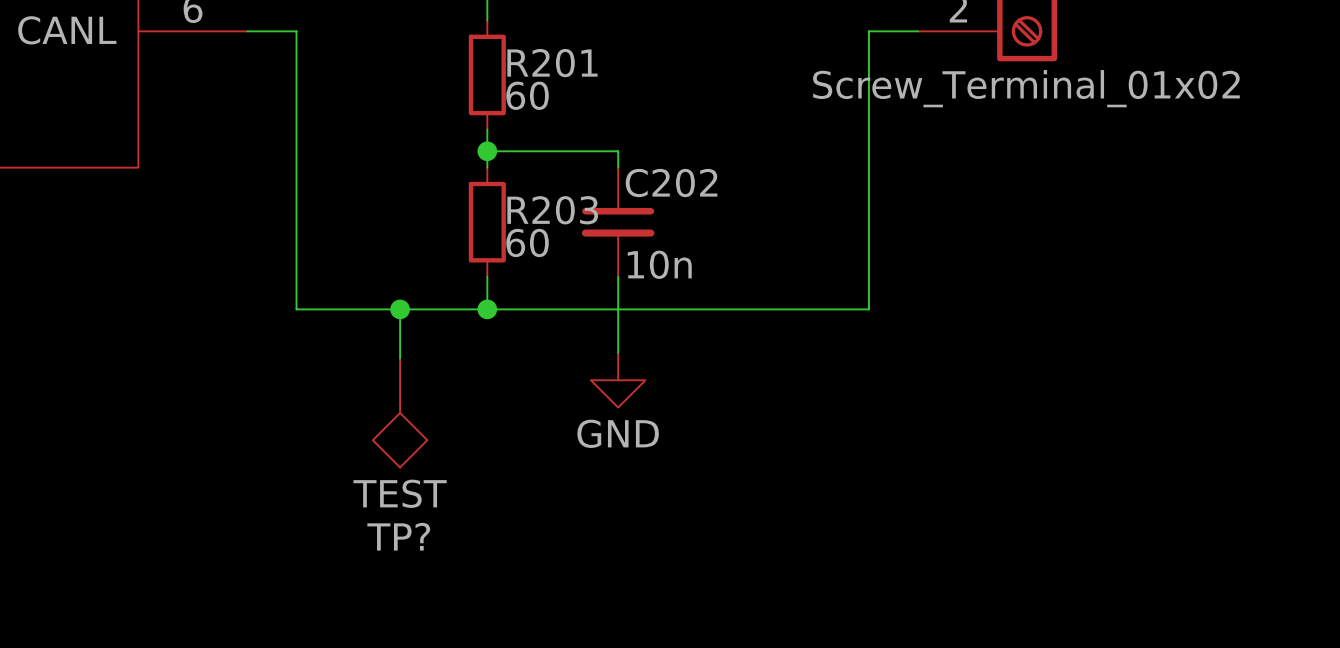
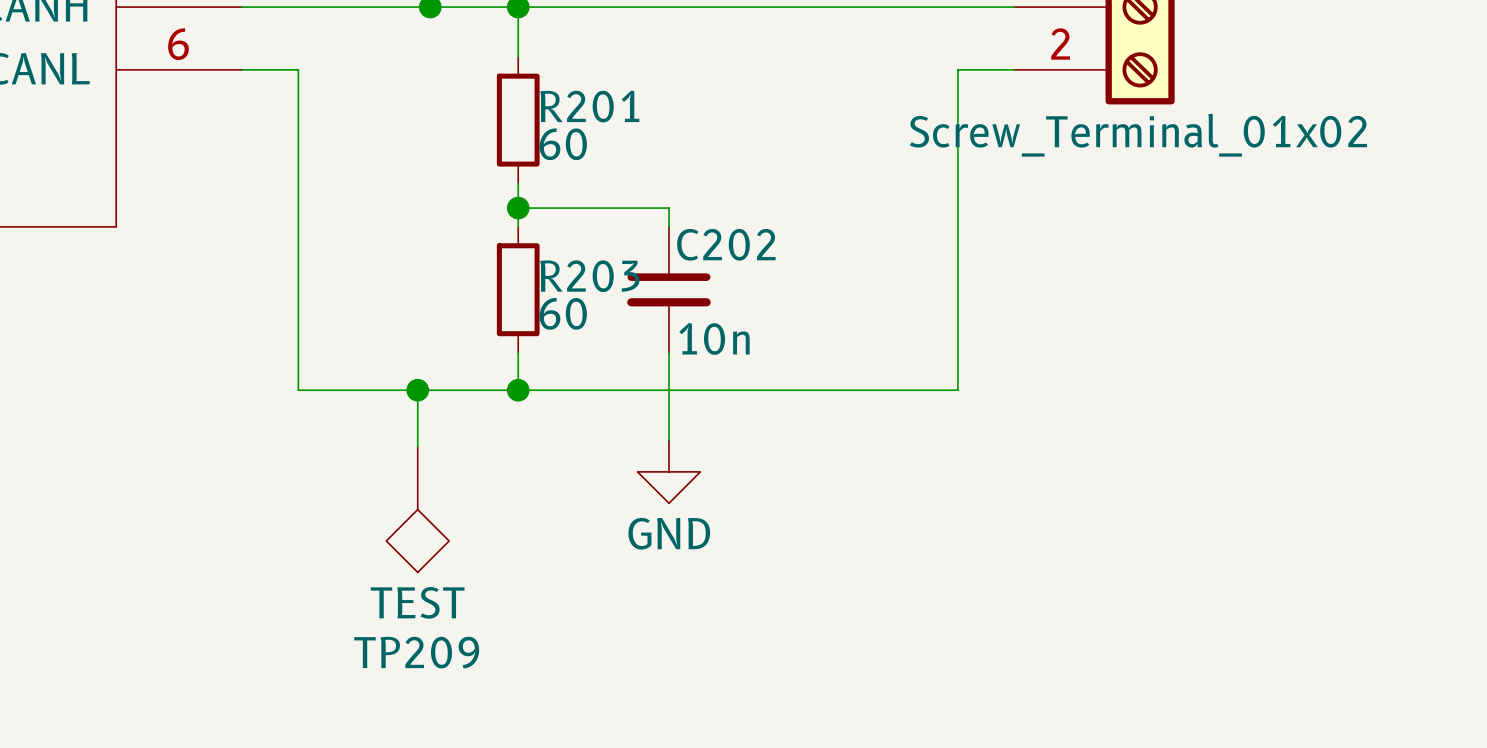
TP? name: TP? (398, 536) -> TP209 (416, 652)

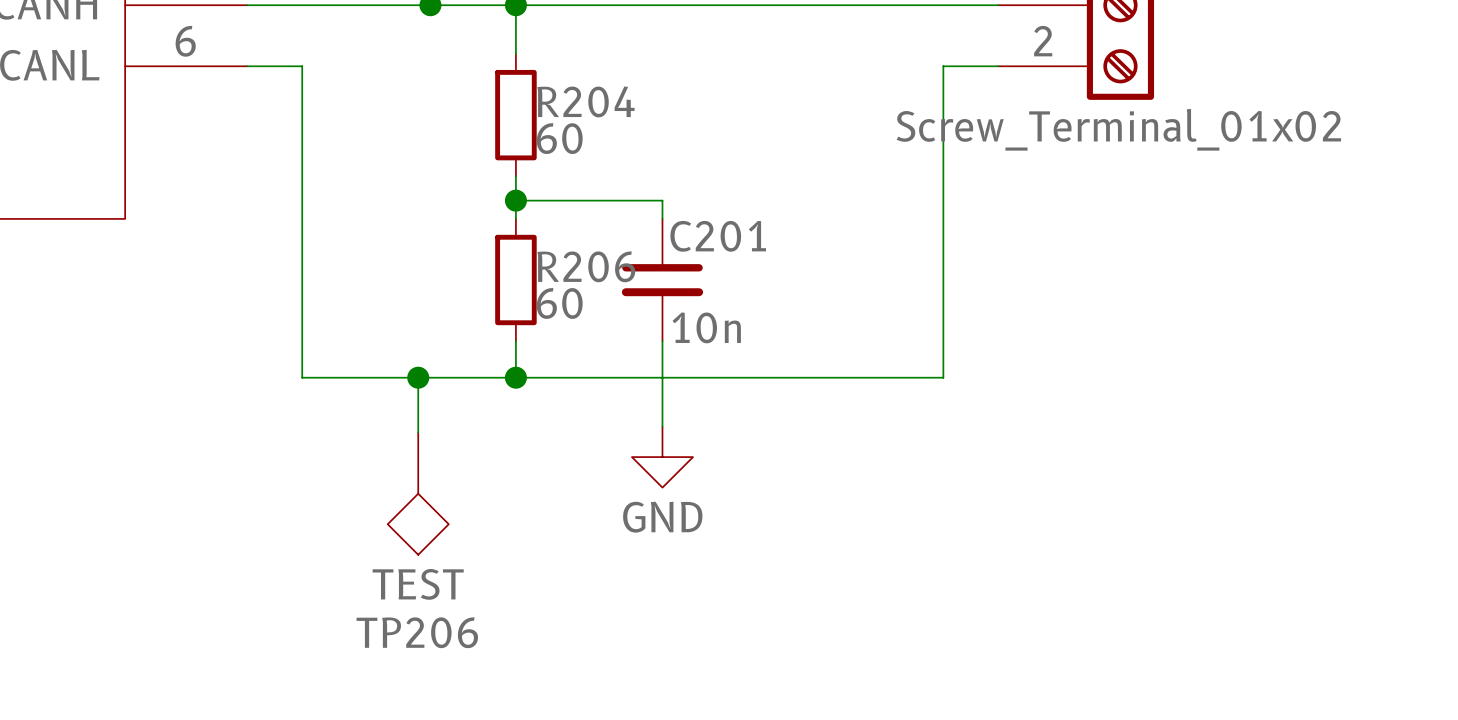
R201 name: R201 (589, 106) -> R204 (586, 101)
C202 name: C202 (726, 244) -> C201 (718, 236)
R203 name: R203 (589, 276) -> R206 (586, 266)
TP209 name: TP209 (416, 652) -> TP206 (417, 632)

